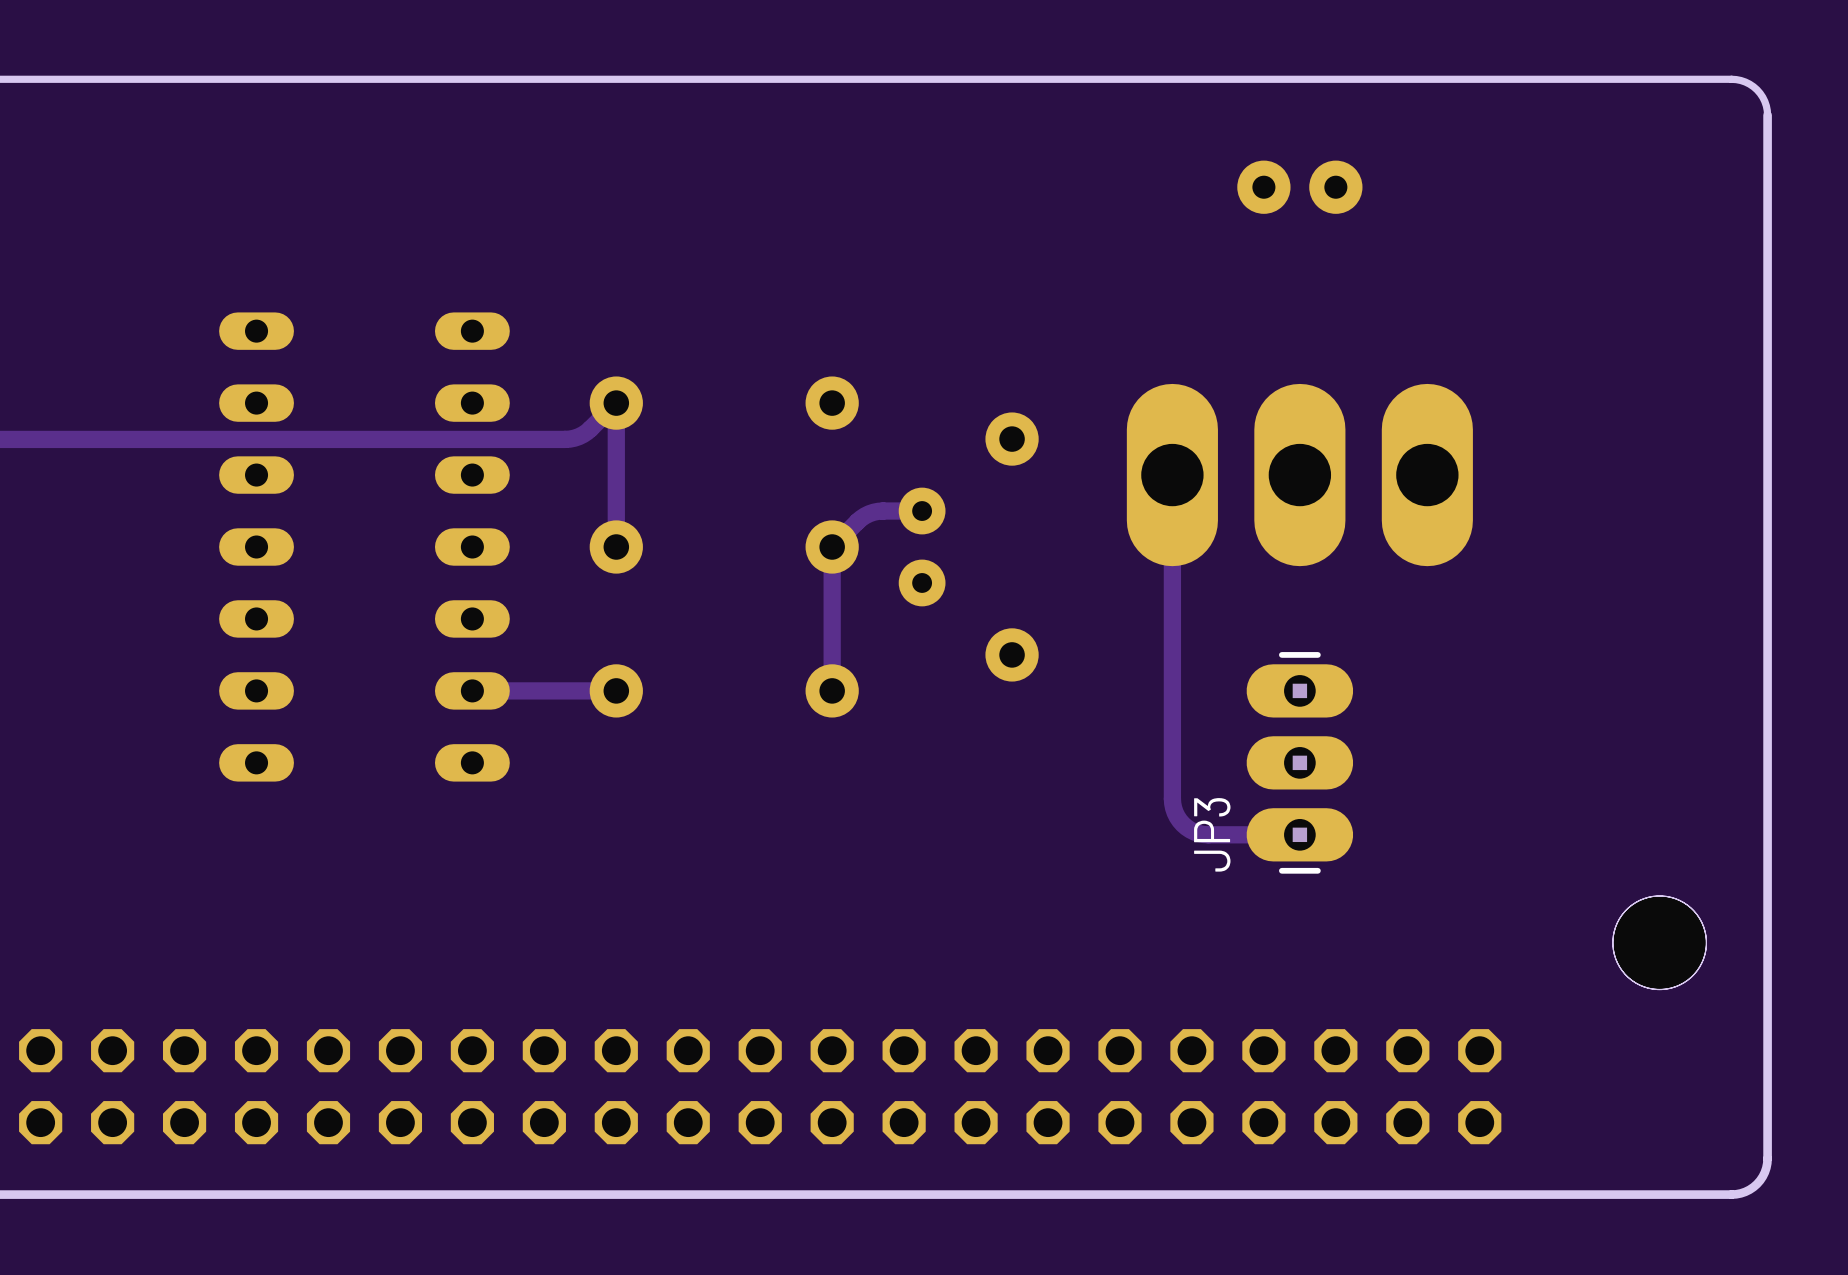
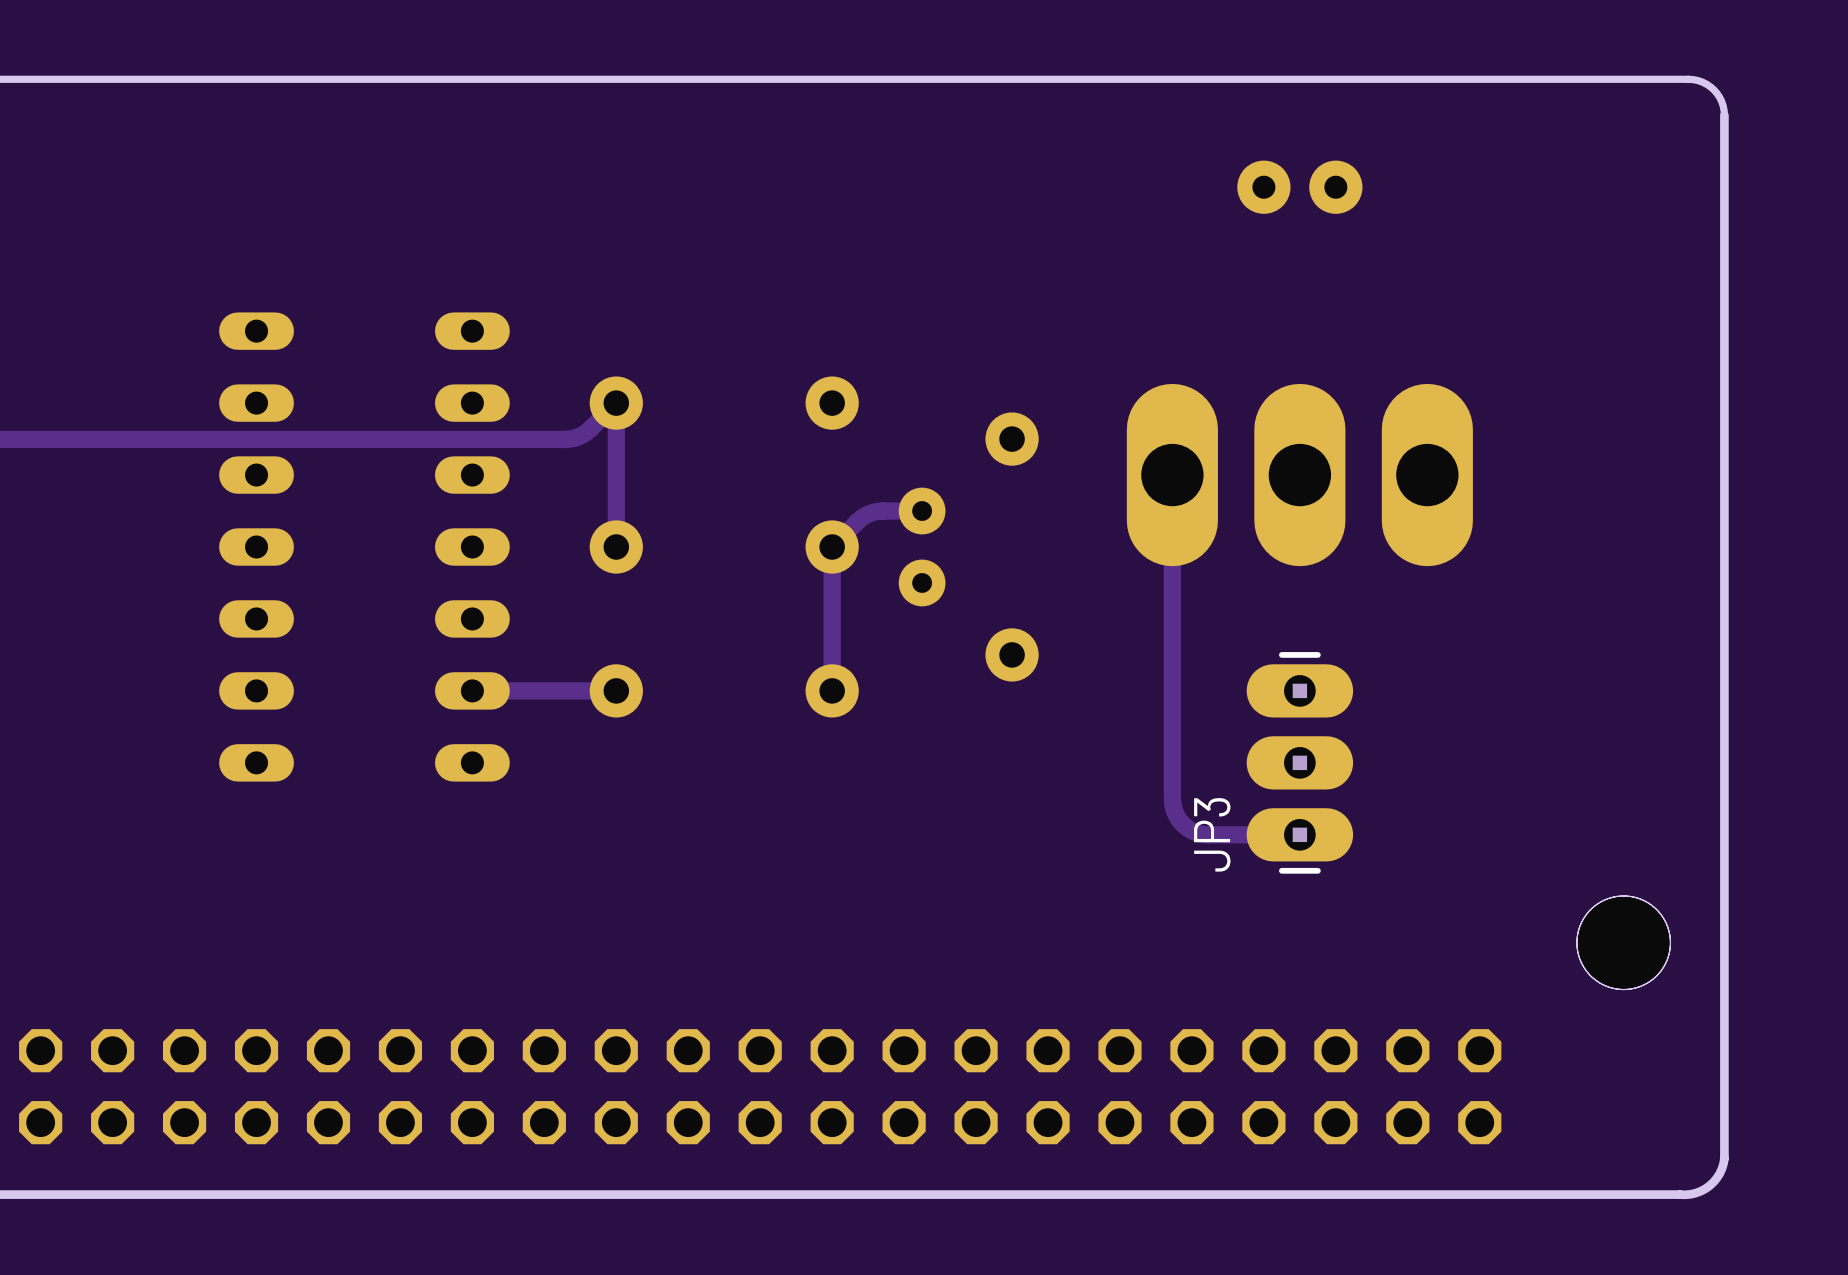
board edge: (1688, 79) (1731, 79) (1745, 82) (1760, 93) (1767, 110) (1767, 1158) (1762, 1176) (1757, 1184) (1745, 1191) (1731, 1194) (1679, 1194) -> (1688, 79) (1702, 82) (1713, 89) (1721, 101) (1724, 115) (1724, 1158) (1719, 1173) (1709, 1185) (1695, 1193) (1679, 1194)
part position: (1659, 942) -> (1623, 942)

